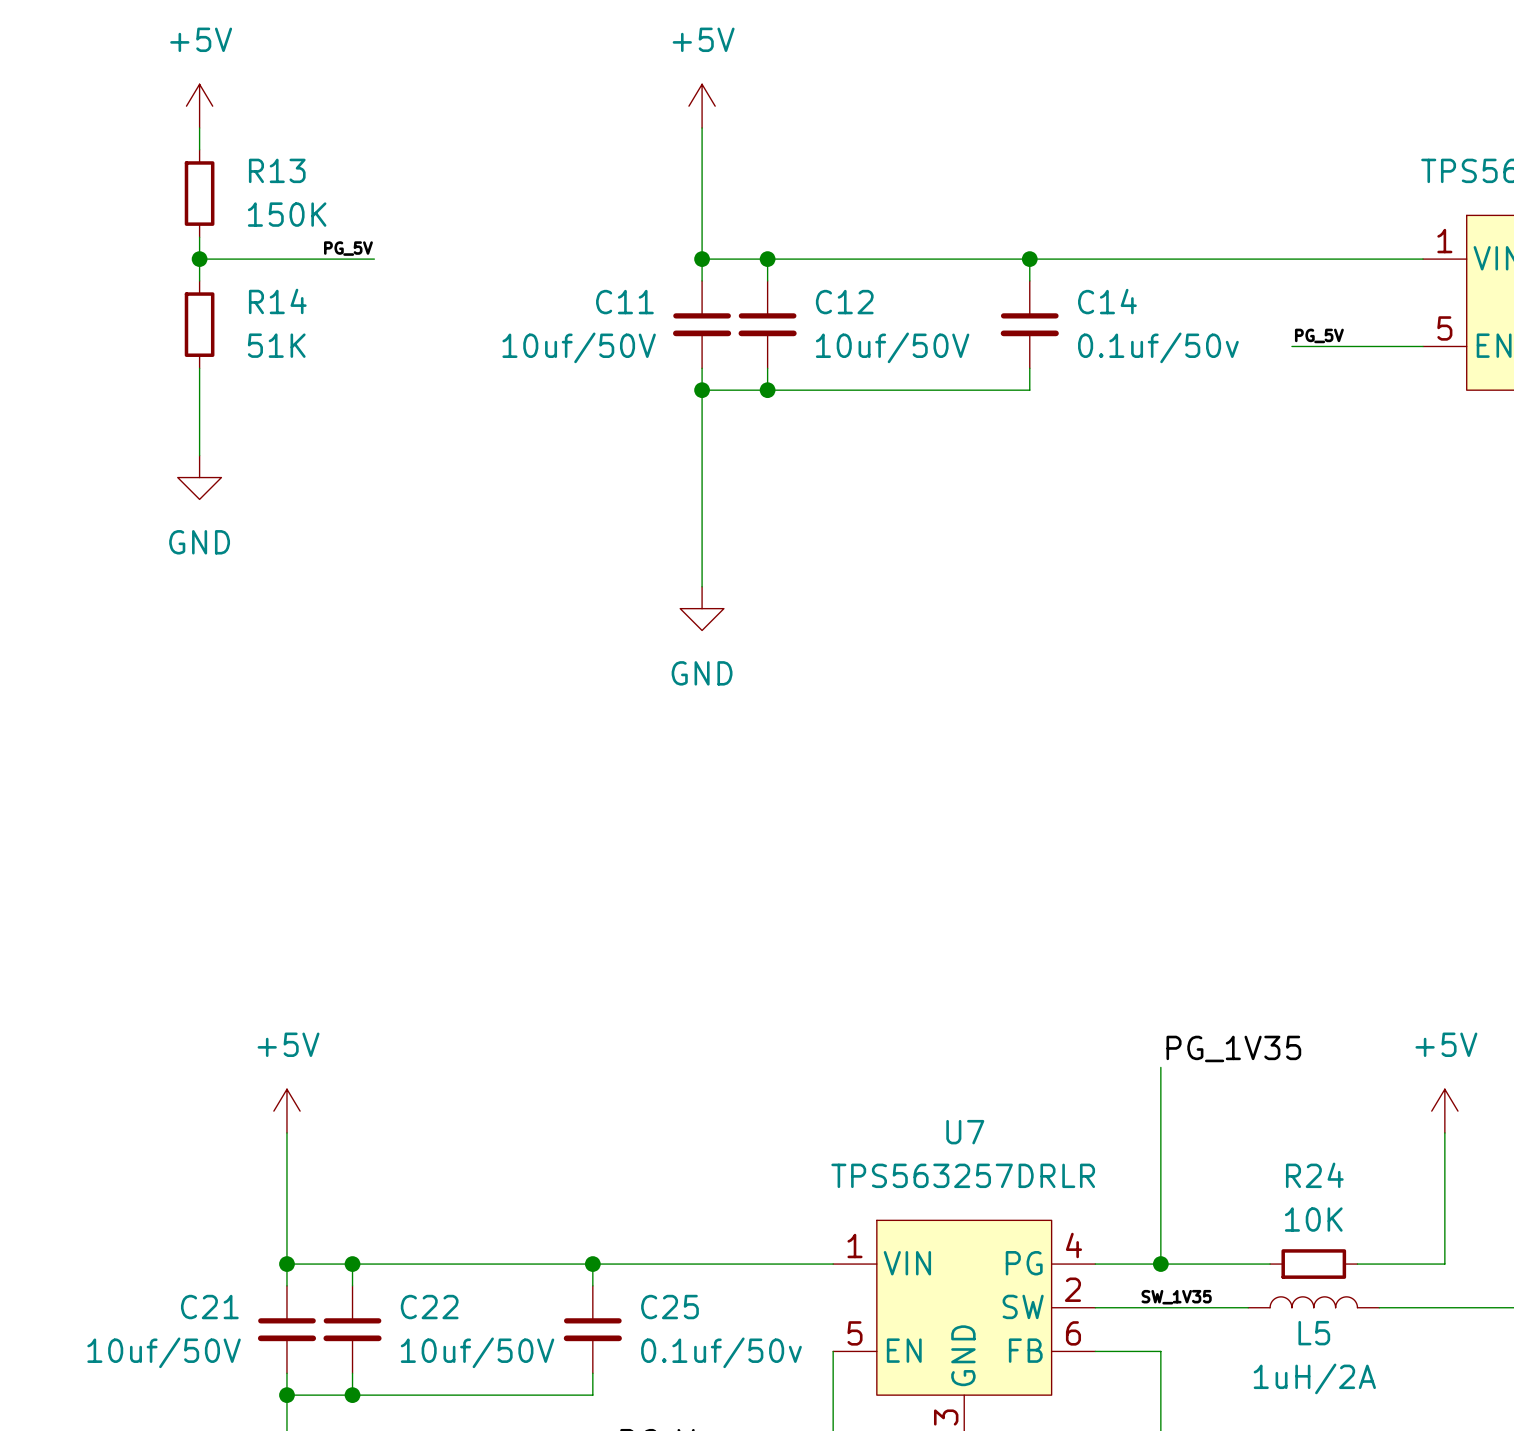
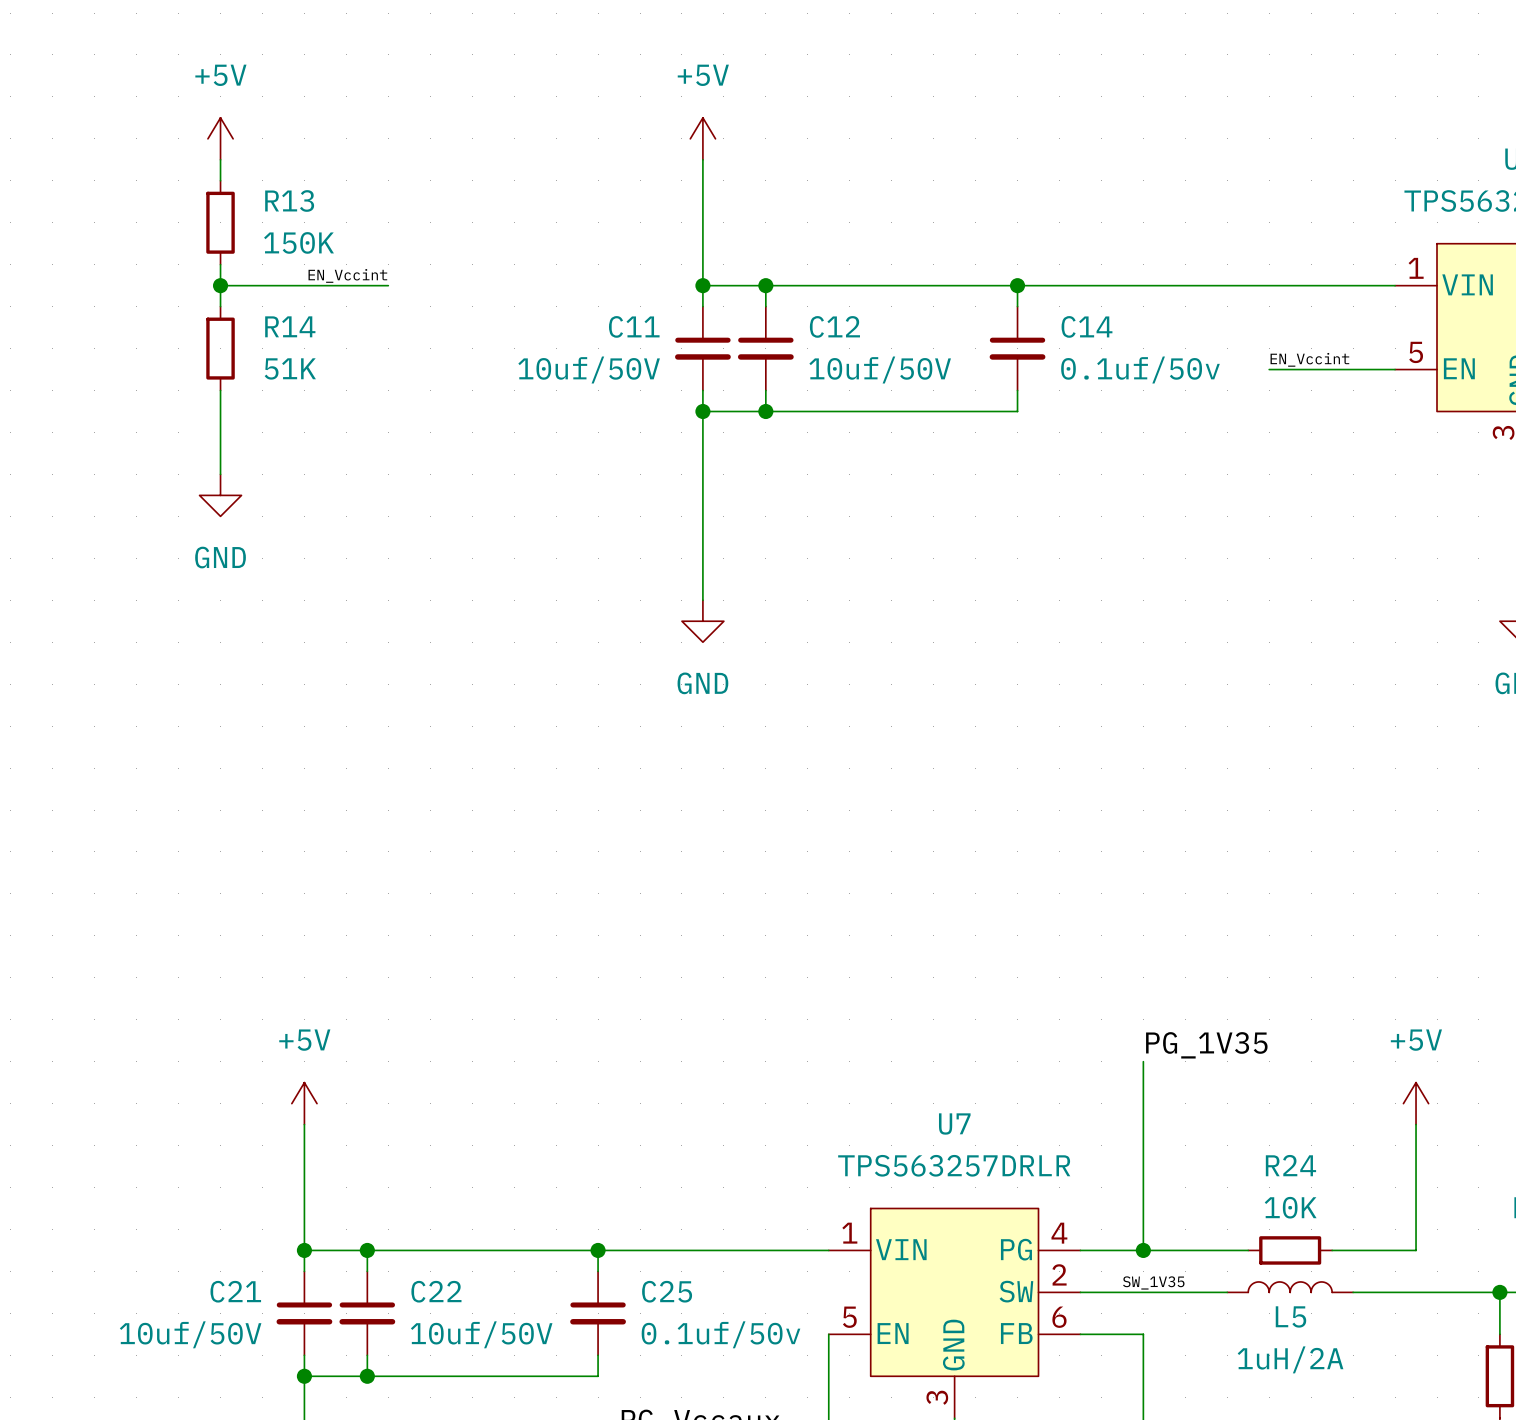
label: PG_5V (348, 248) -> EN_Vccint (347, 275)
label: PG_5V (1319, 335) -> EN_Vccint (1309, 359)

